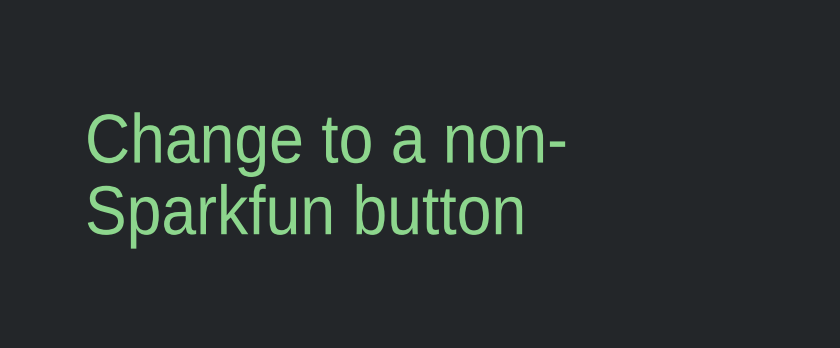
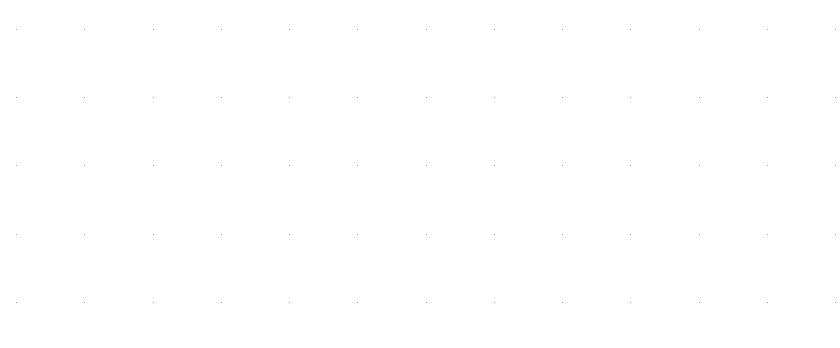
text: Change to a non- (326, 144) -> none
text: Sparkfun button (304, 216) -> none

